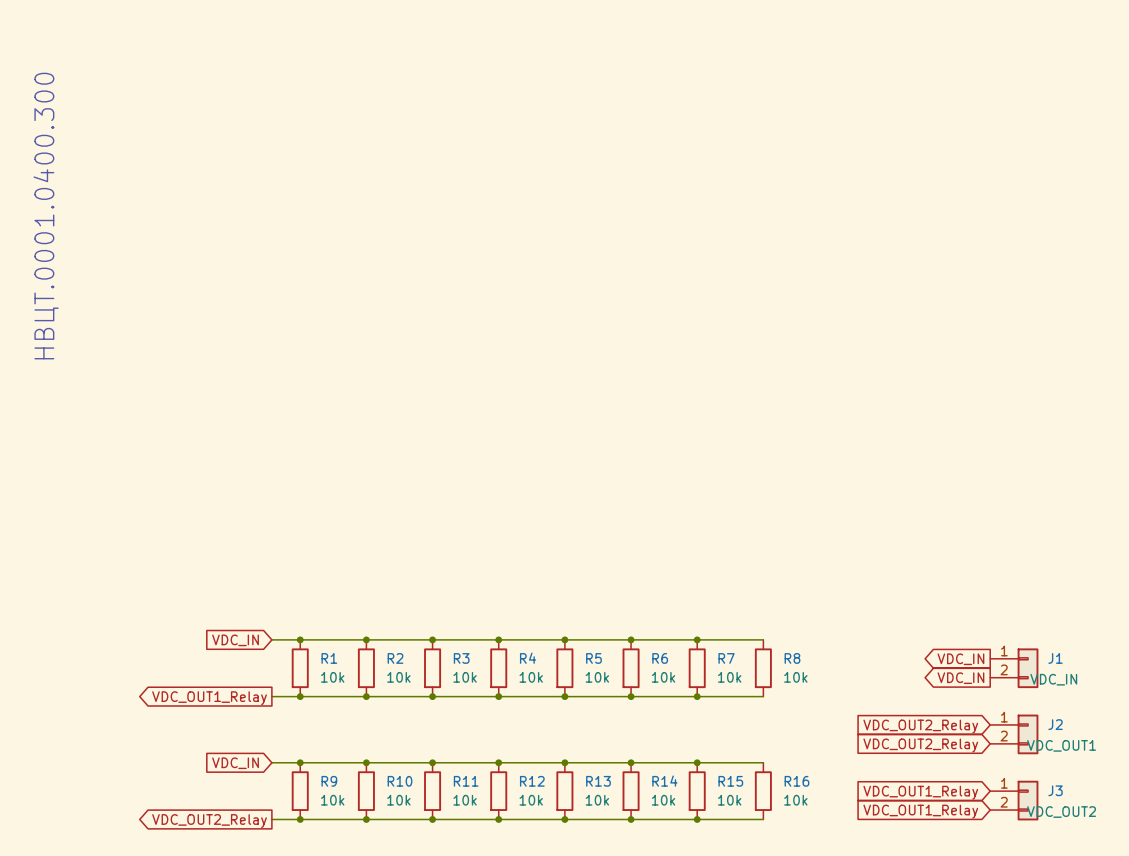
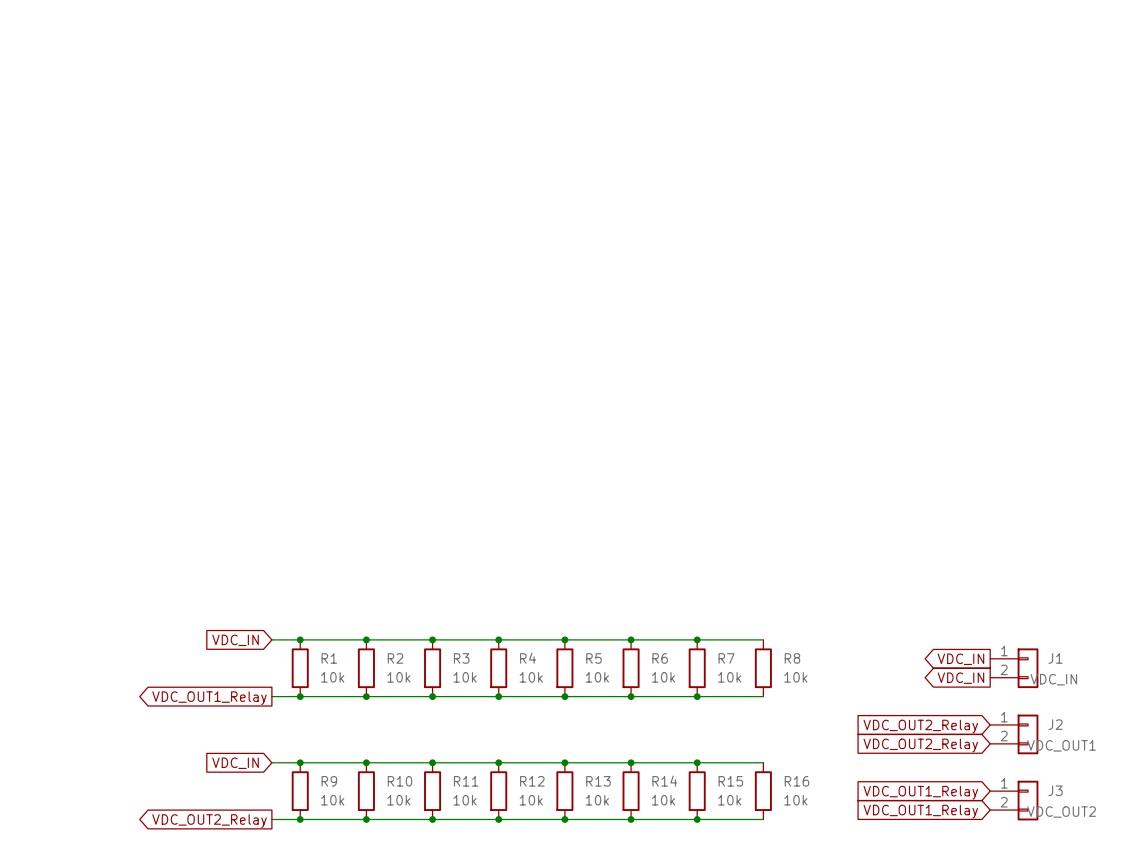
text: НВЦТ.0001.0400.300 (46, 216) -> none

